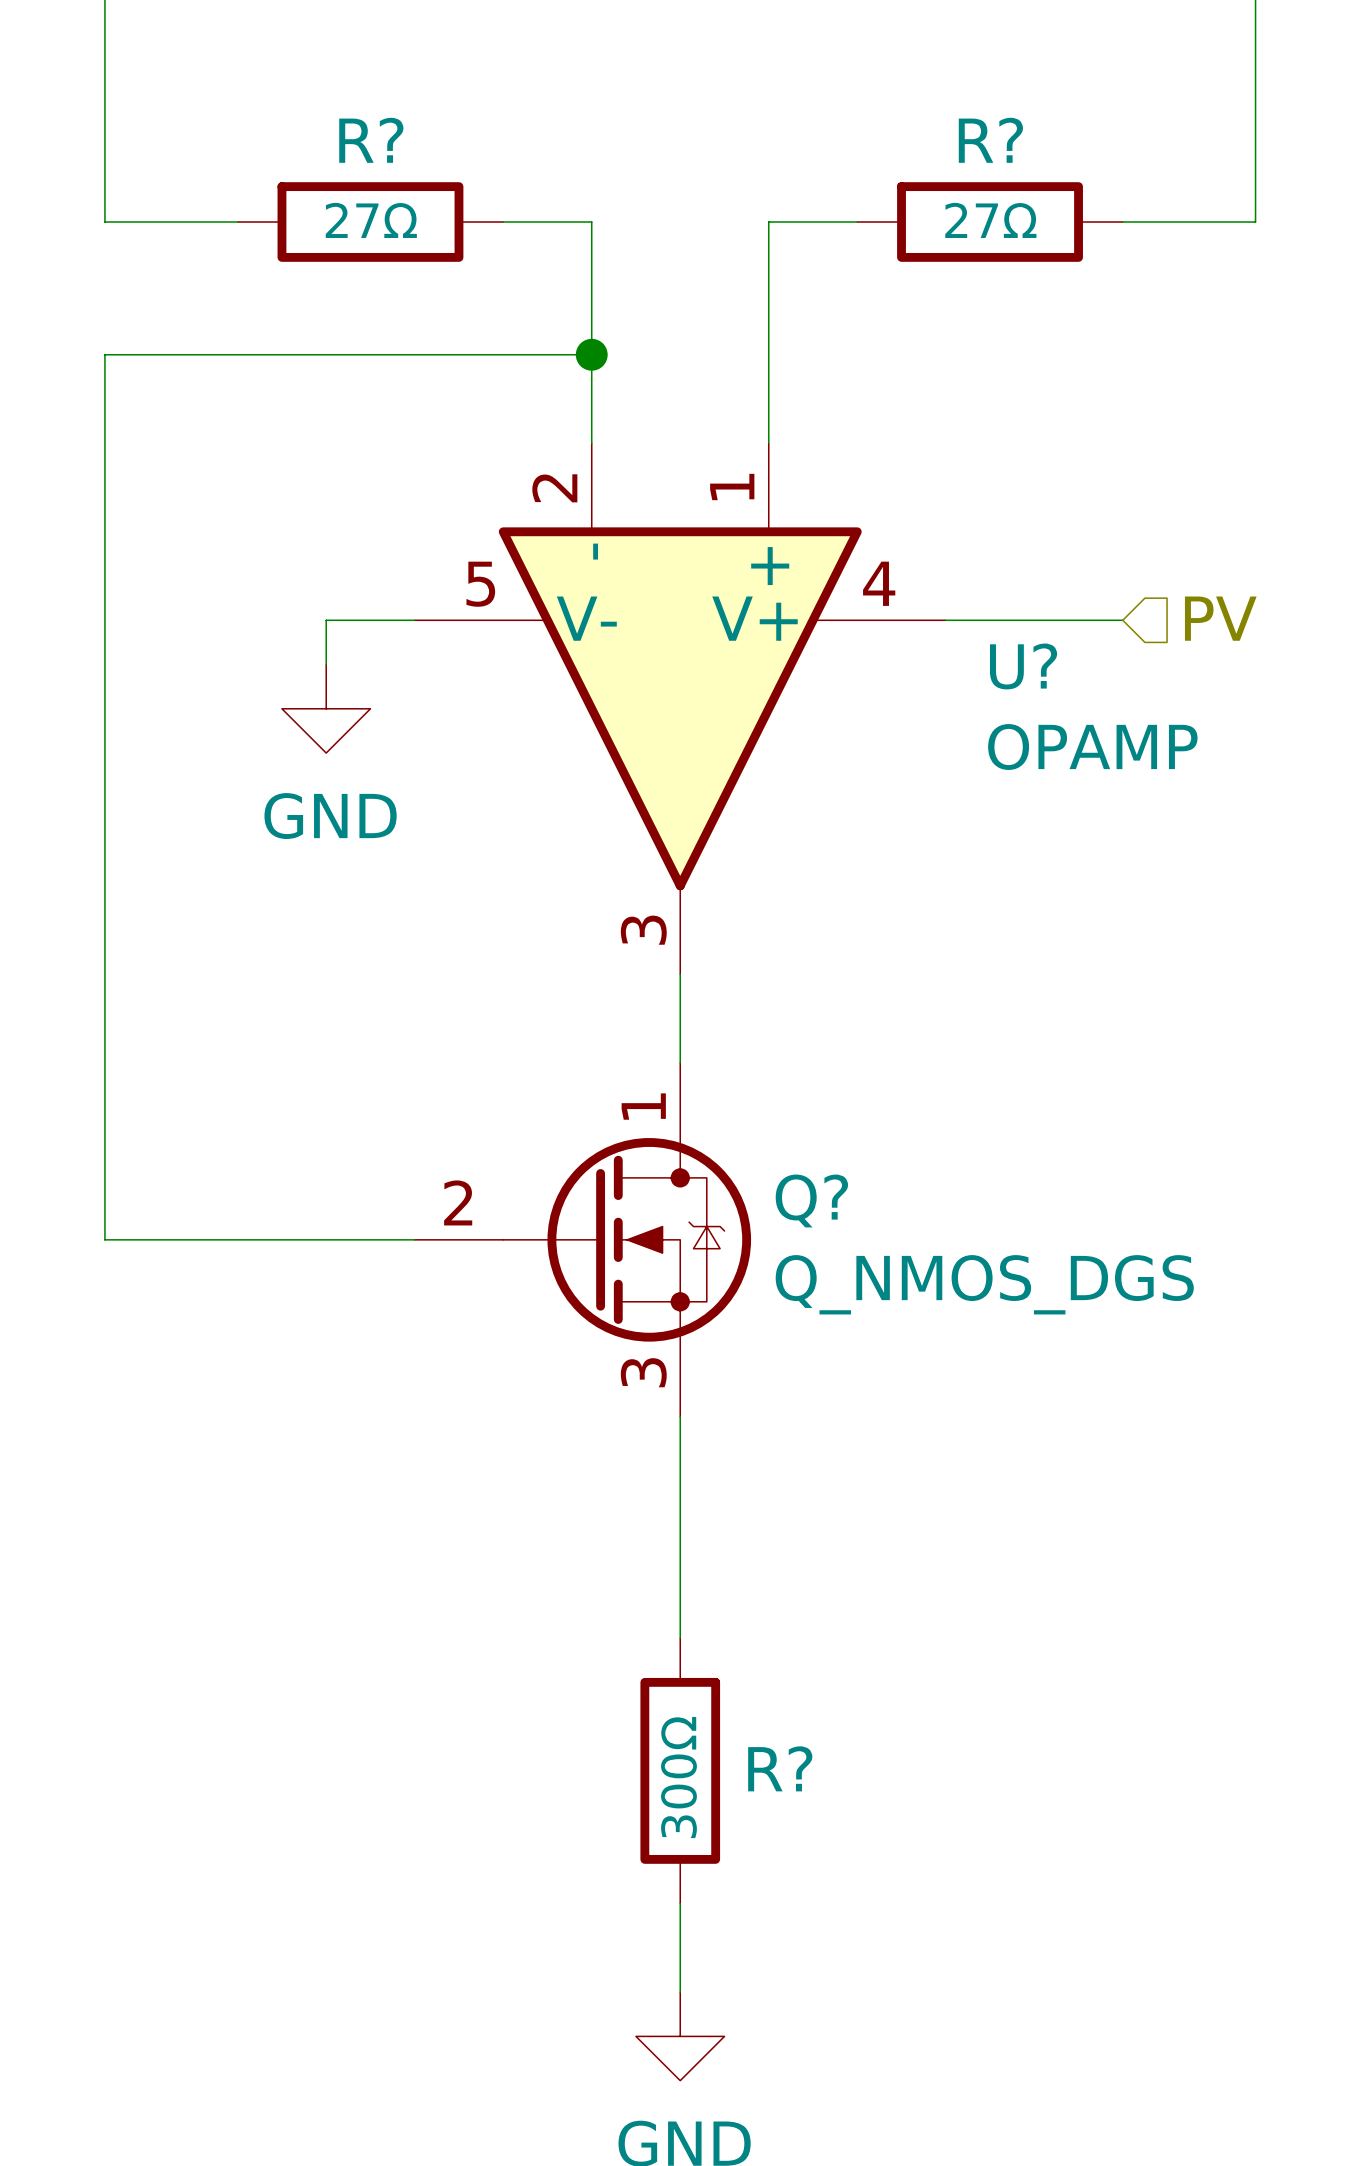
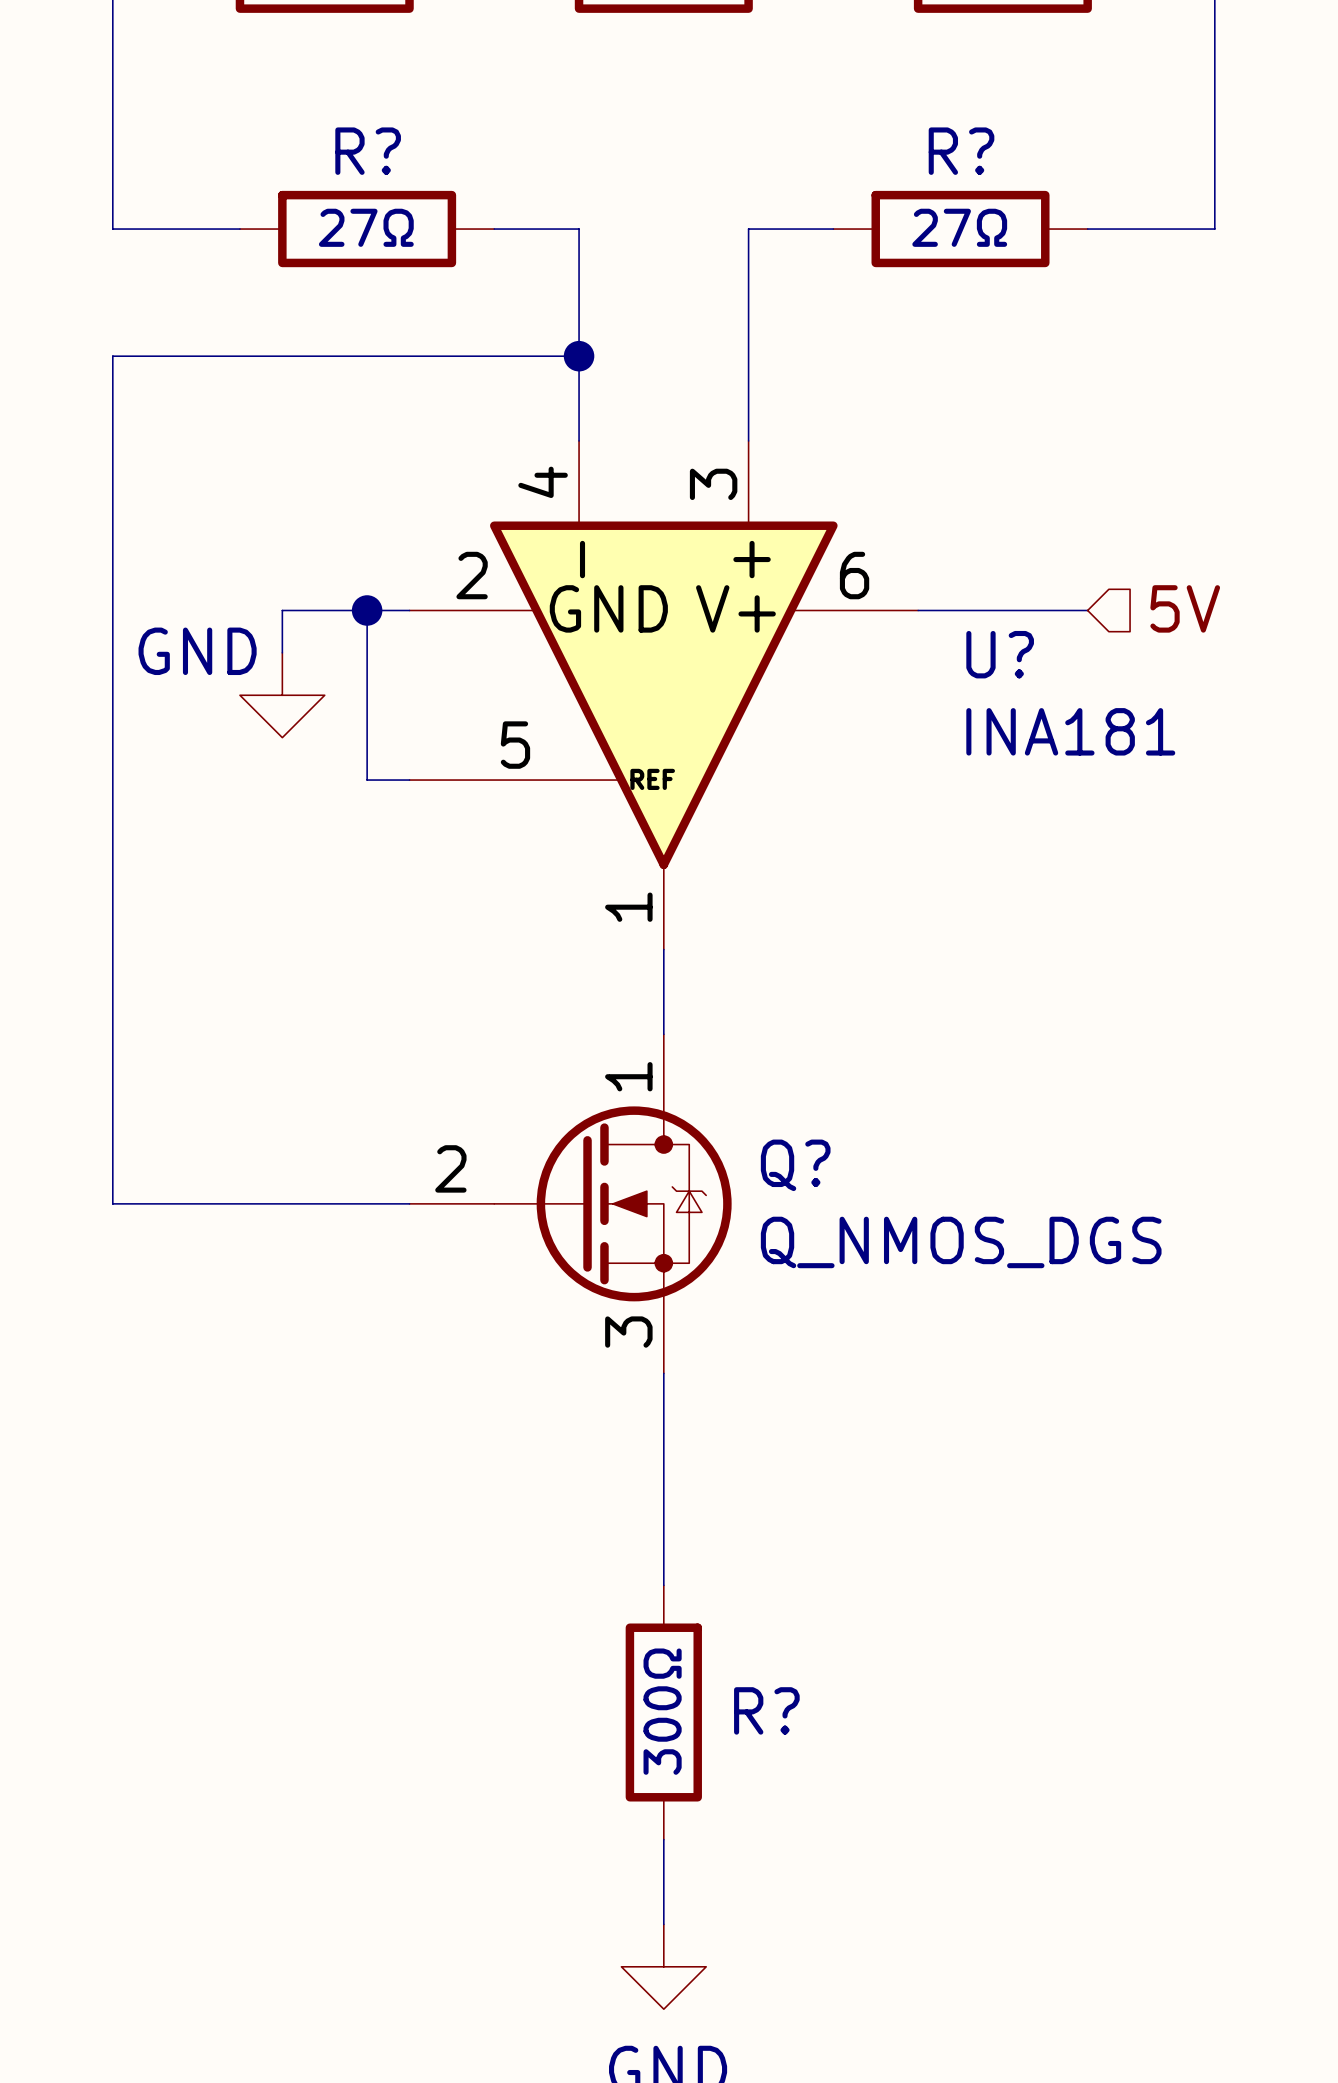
U? symbol: [414, 443, 946, 975] -> [409, 440, 919, 950]
hierarchical label: PV (1220, 618) -> 5V (1185, 608)
wire: (326, 620) (326, 664) -> (324, 610) (282, 610) (282, 652)
wire: none -> (367, 610) (367, 780) (409, 780)
junction: none -> (367, 610)
power symbol position: GND (326, 708) -> GND (282, 695)
U? value: OPAMP (1092, 747) -> INA181 (1070, 731)
power symbol text position: GND (330, 816) -> GND (197, 651)

